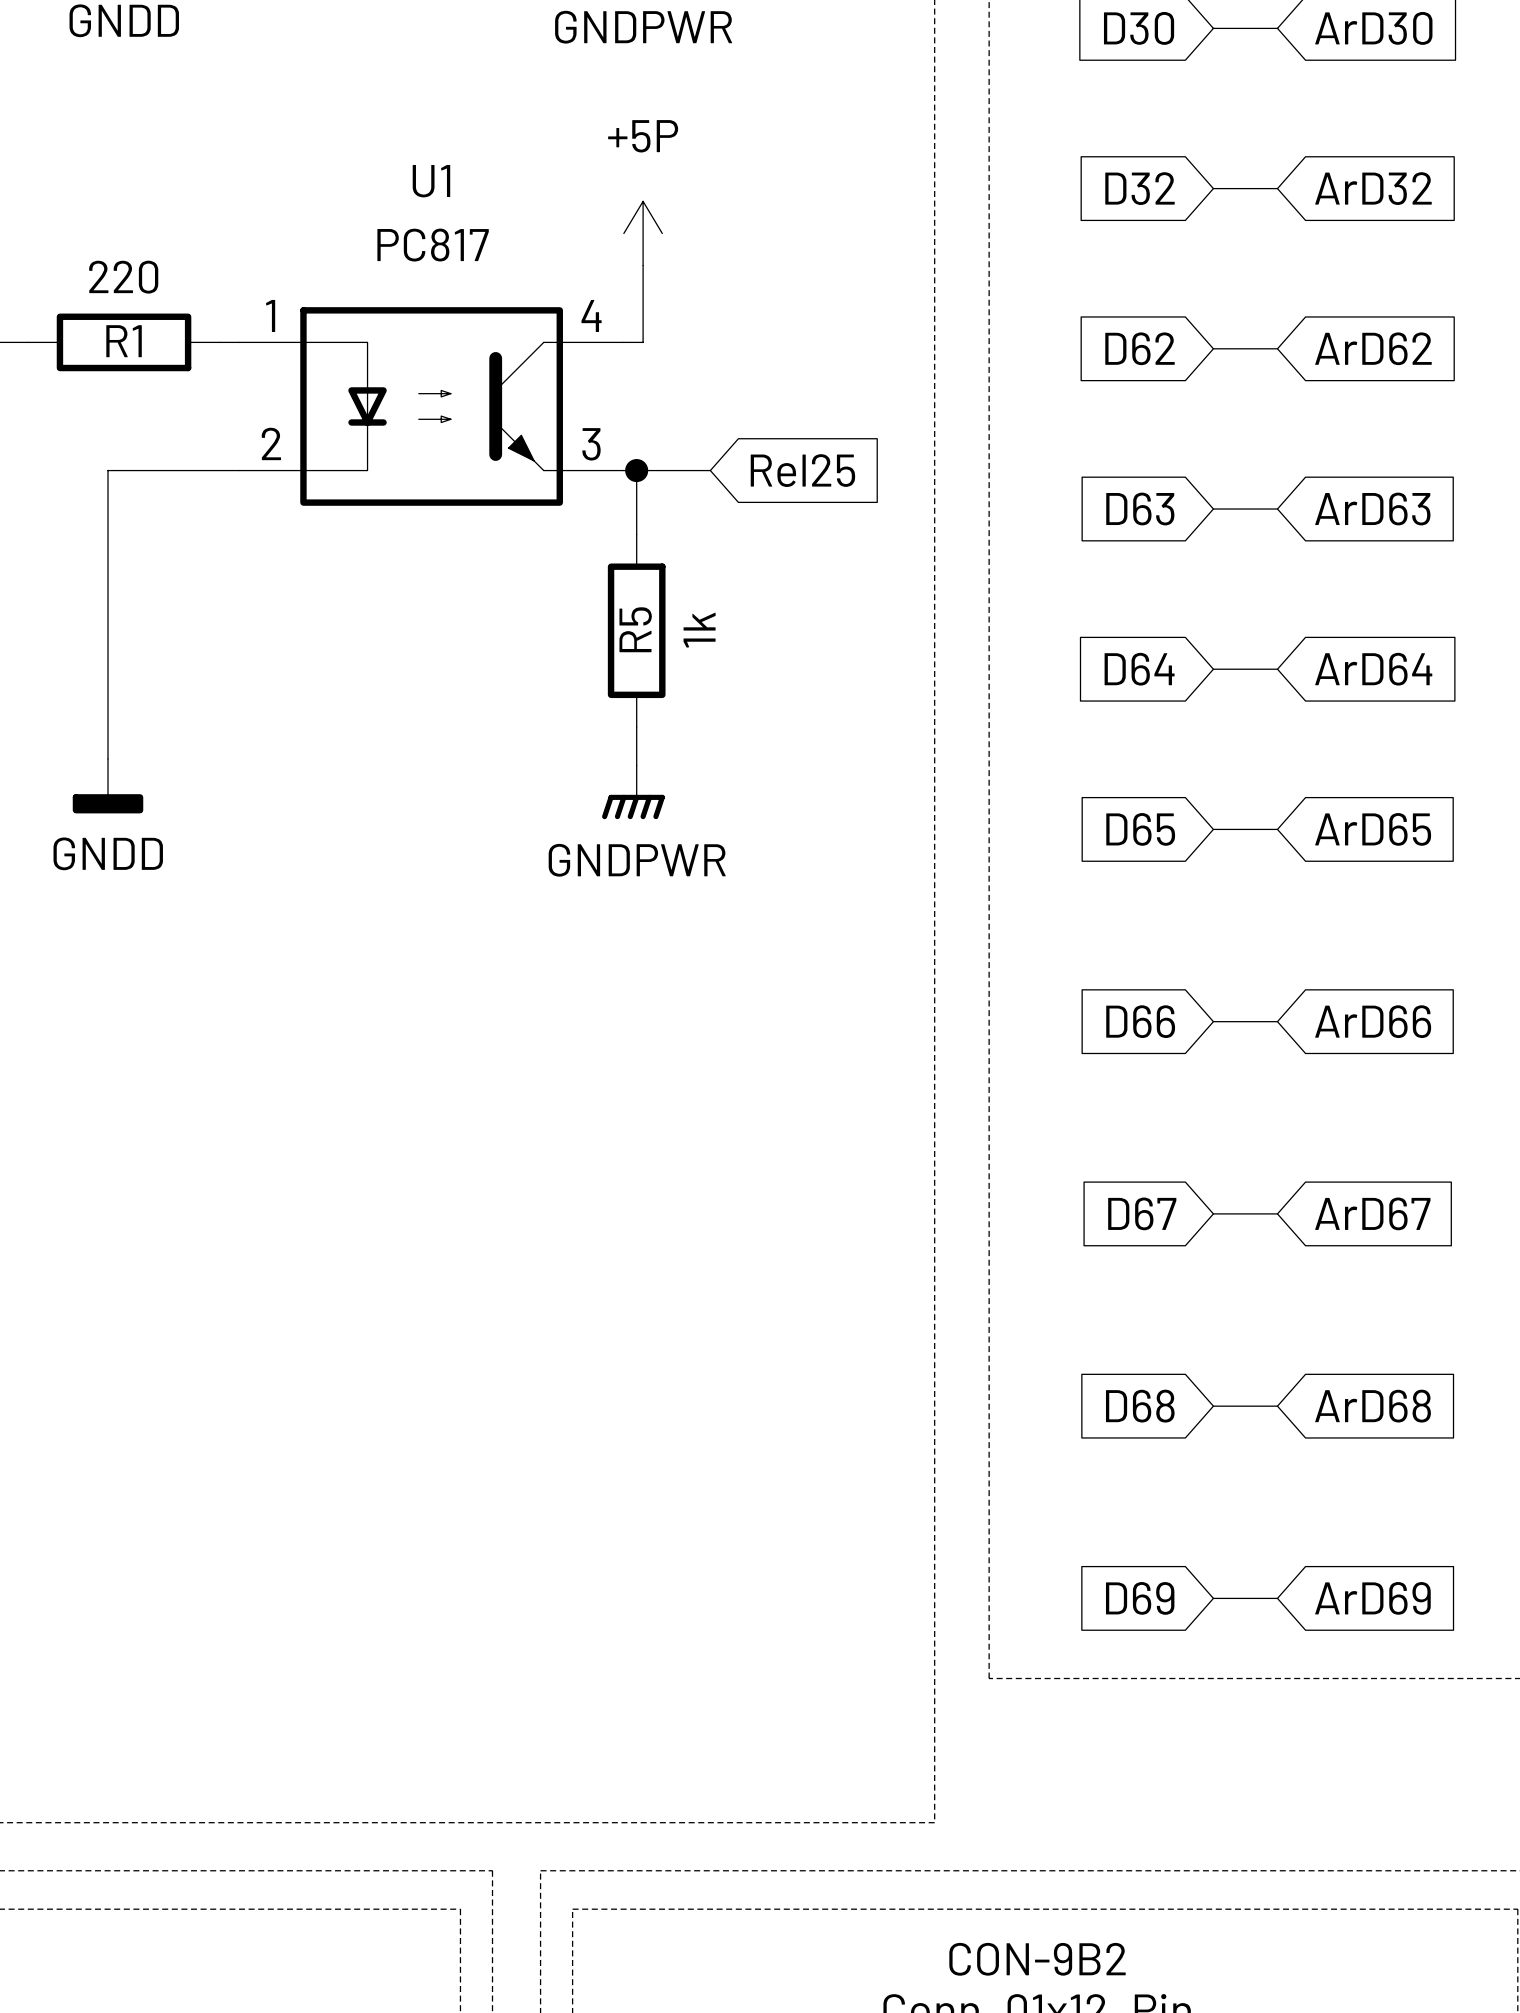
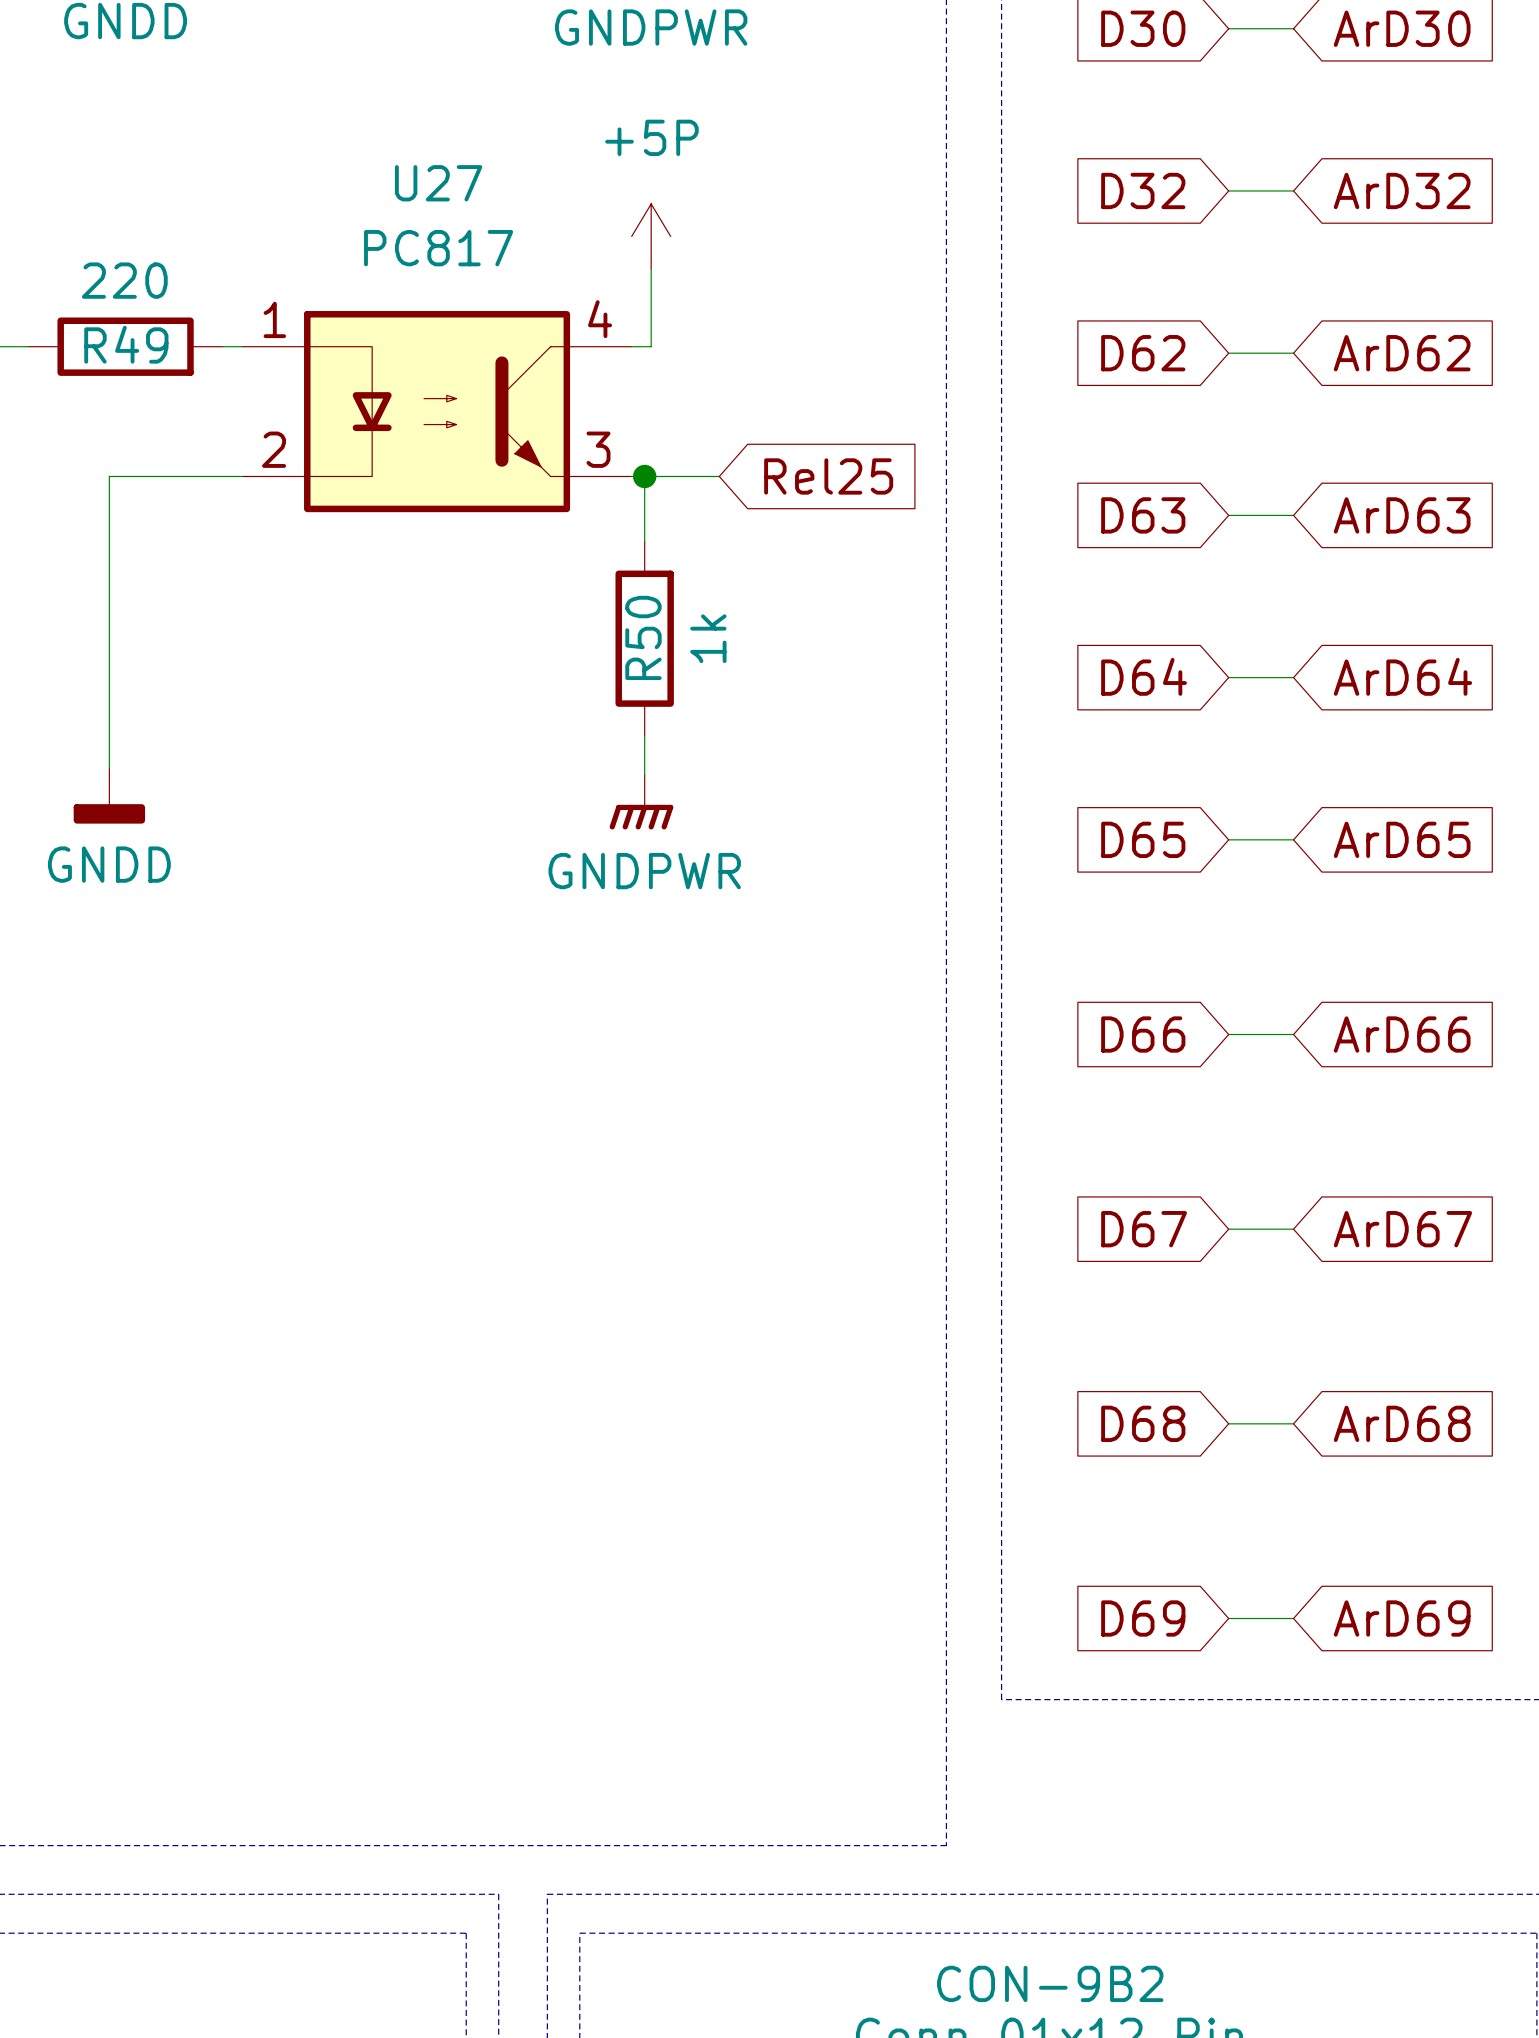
U1 name: U1 (431, 181) -> U27 (438, 183)
R1 name: R1 (124, 341) -> R49 (126, 344)
R5 name: R5 (635, 629) -> R50 (643, 637)

